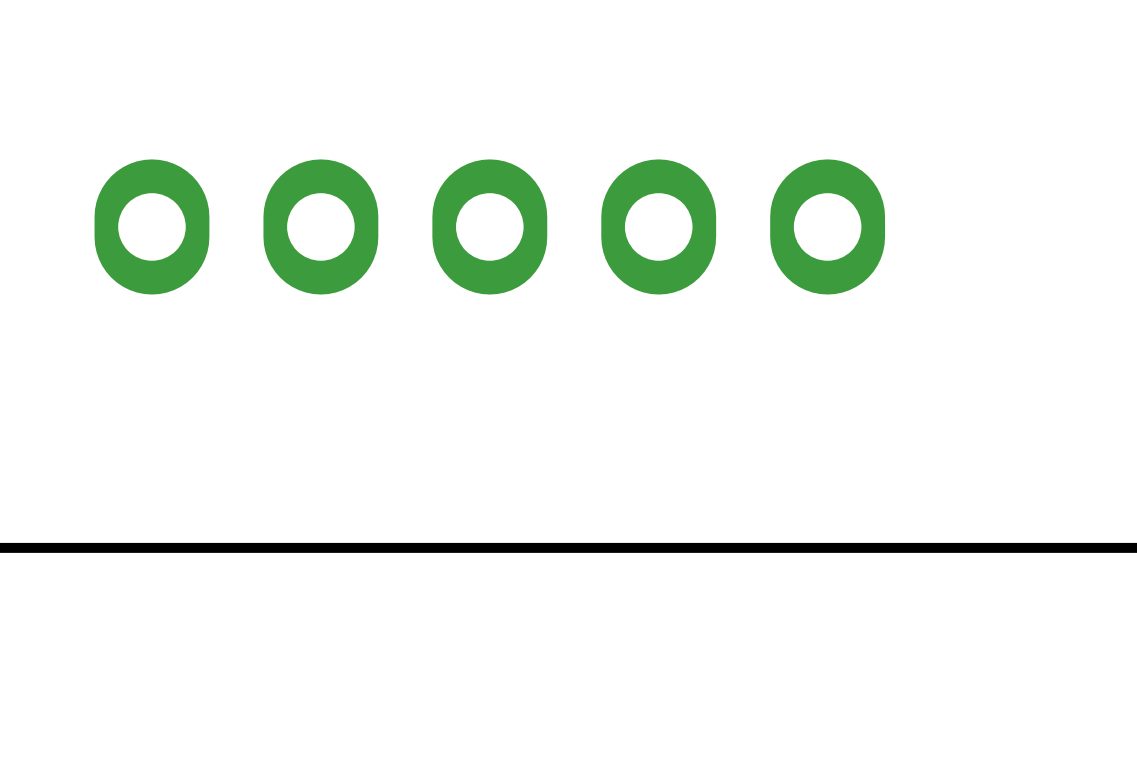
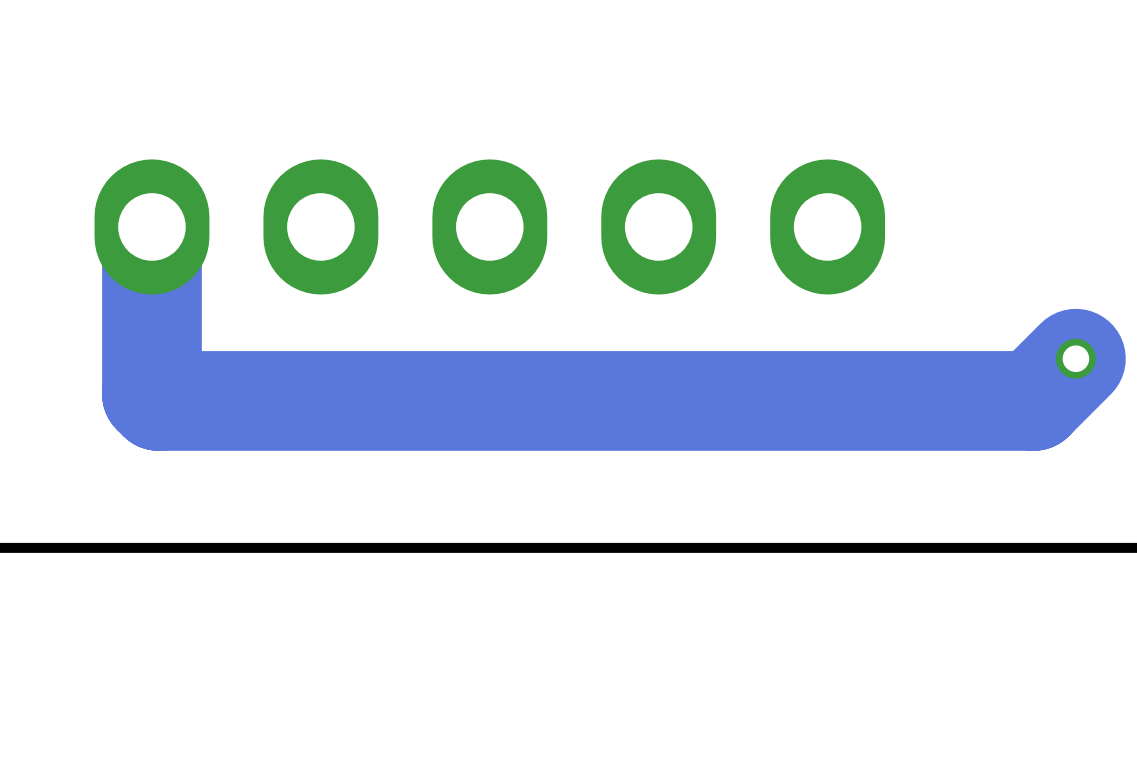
track: none -> (151, 226) (151, 394) (158, 400) (1033, 400) (1075, 358)
via: none -> (1075, 358)

